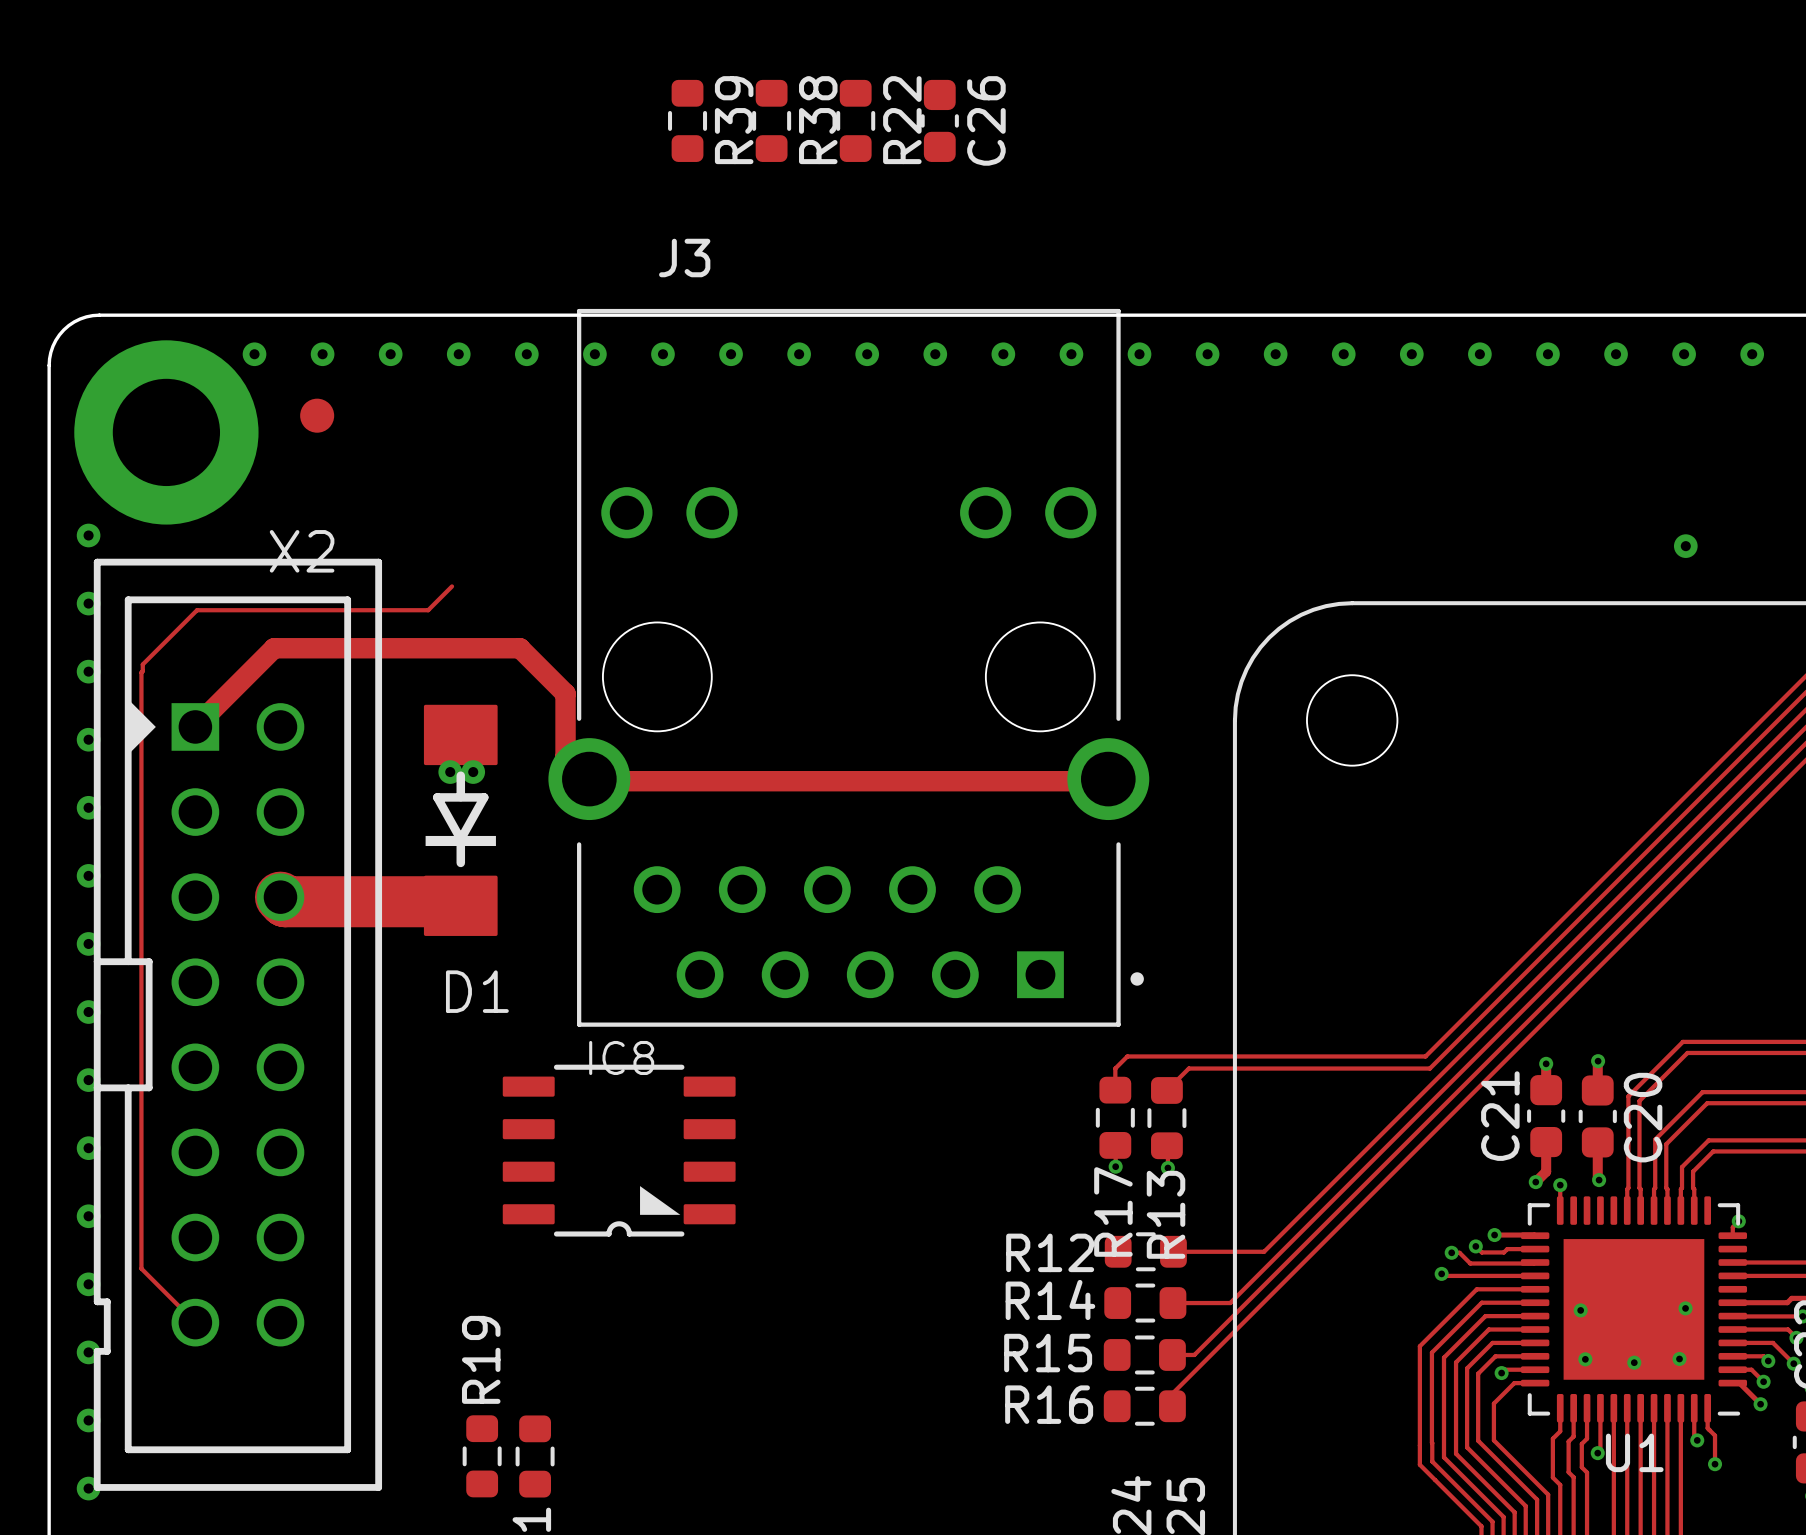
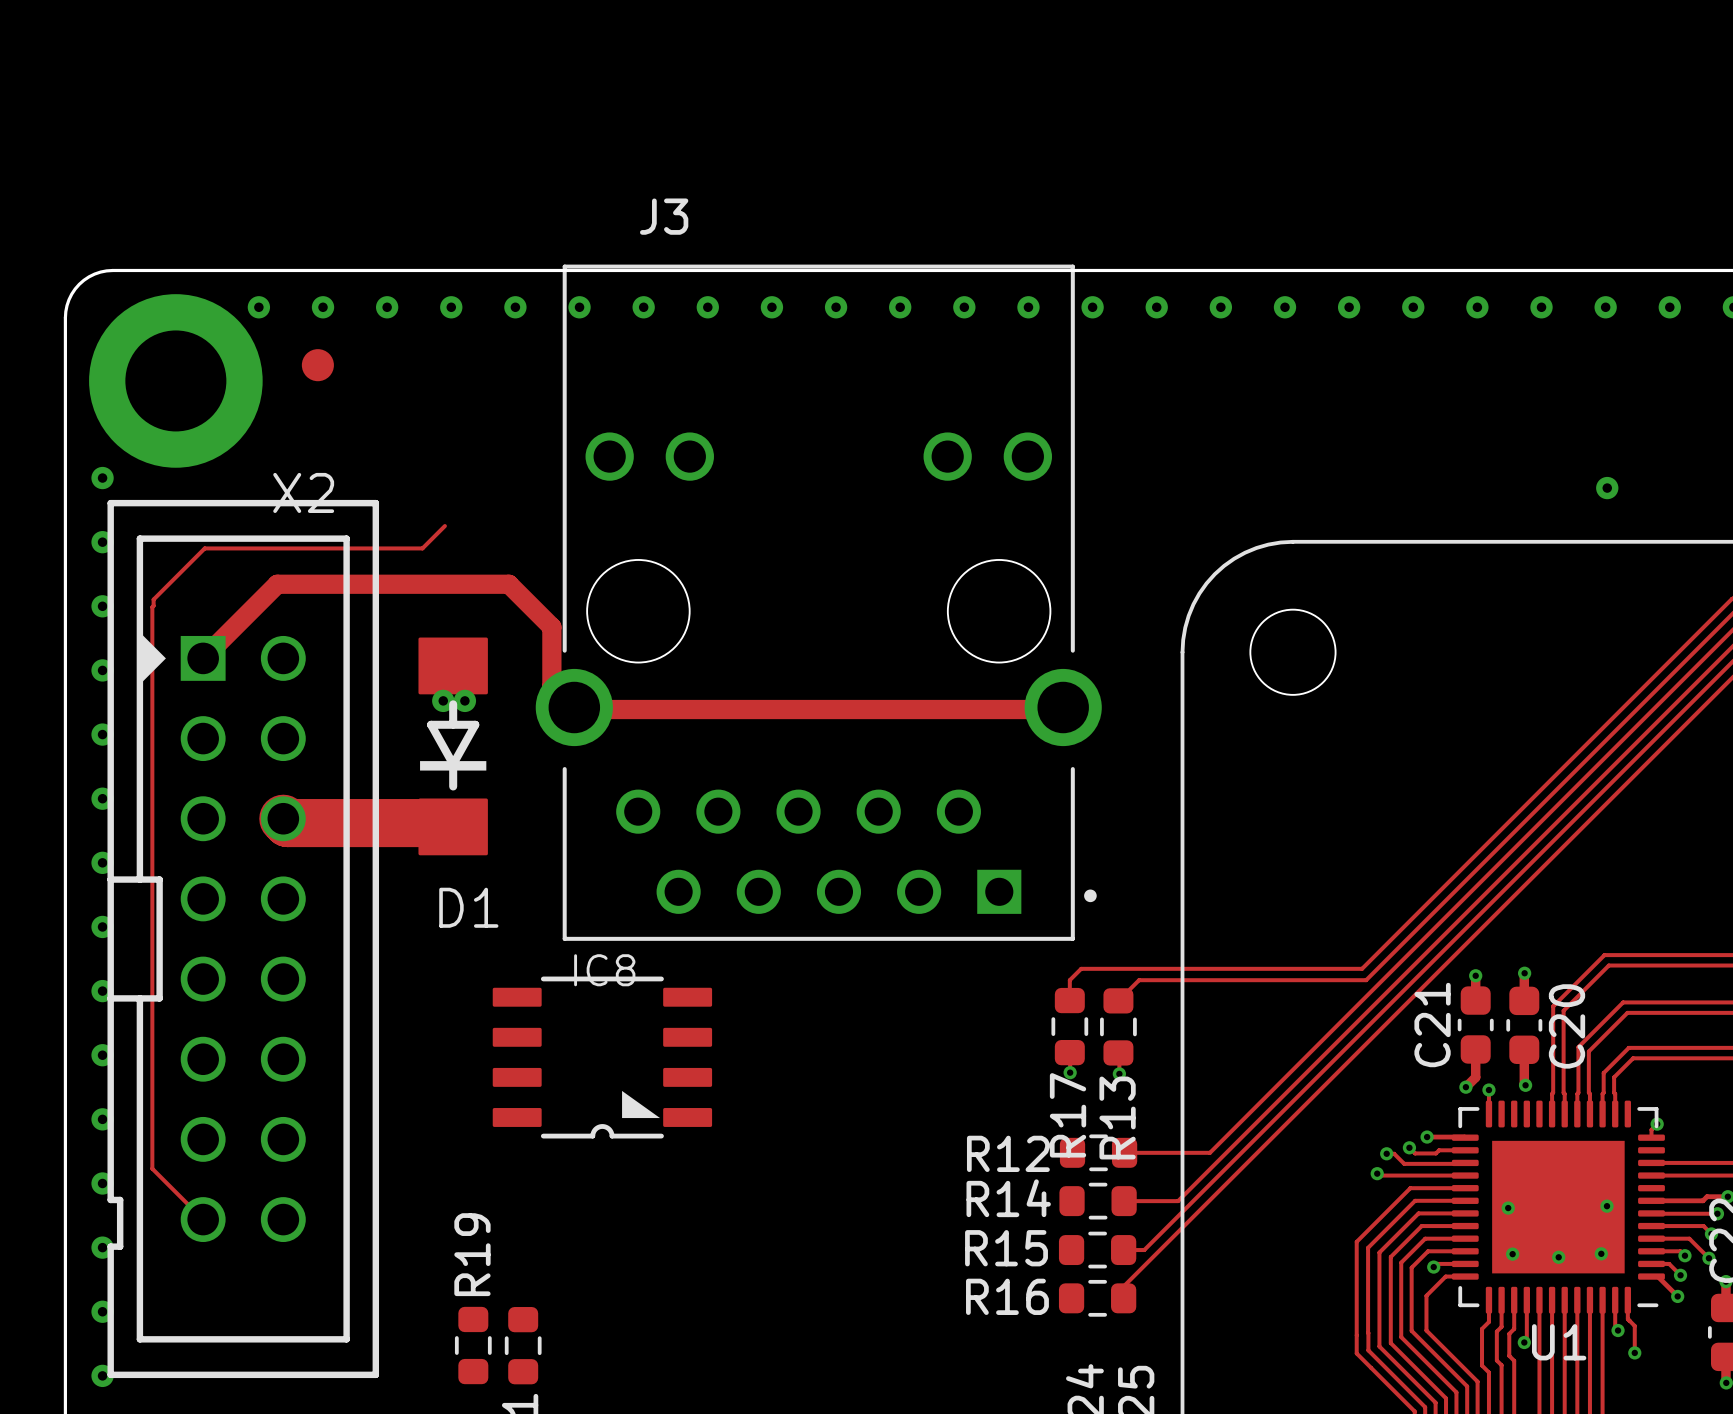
R39: (687, 120) -> none
R38: (771, 120) -> none
R22: (855, 120) -> none
C26: (939, 120) -> none

